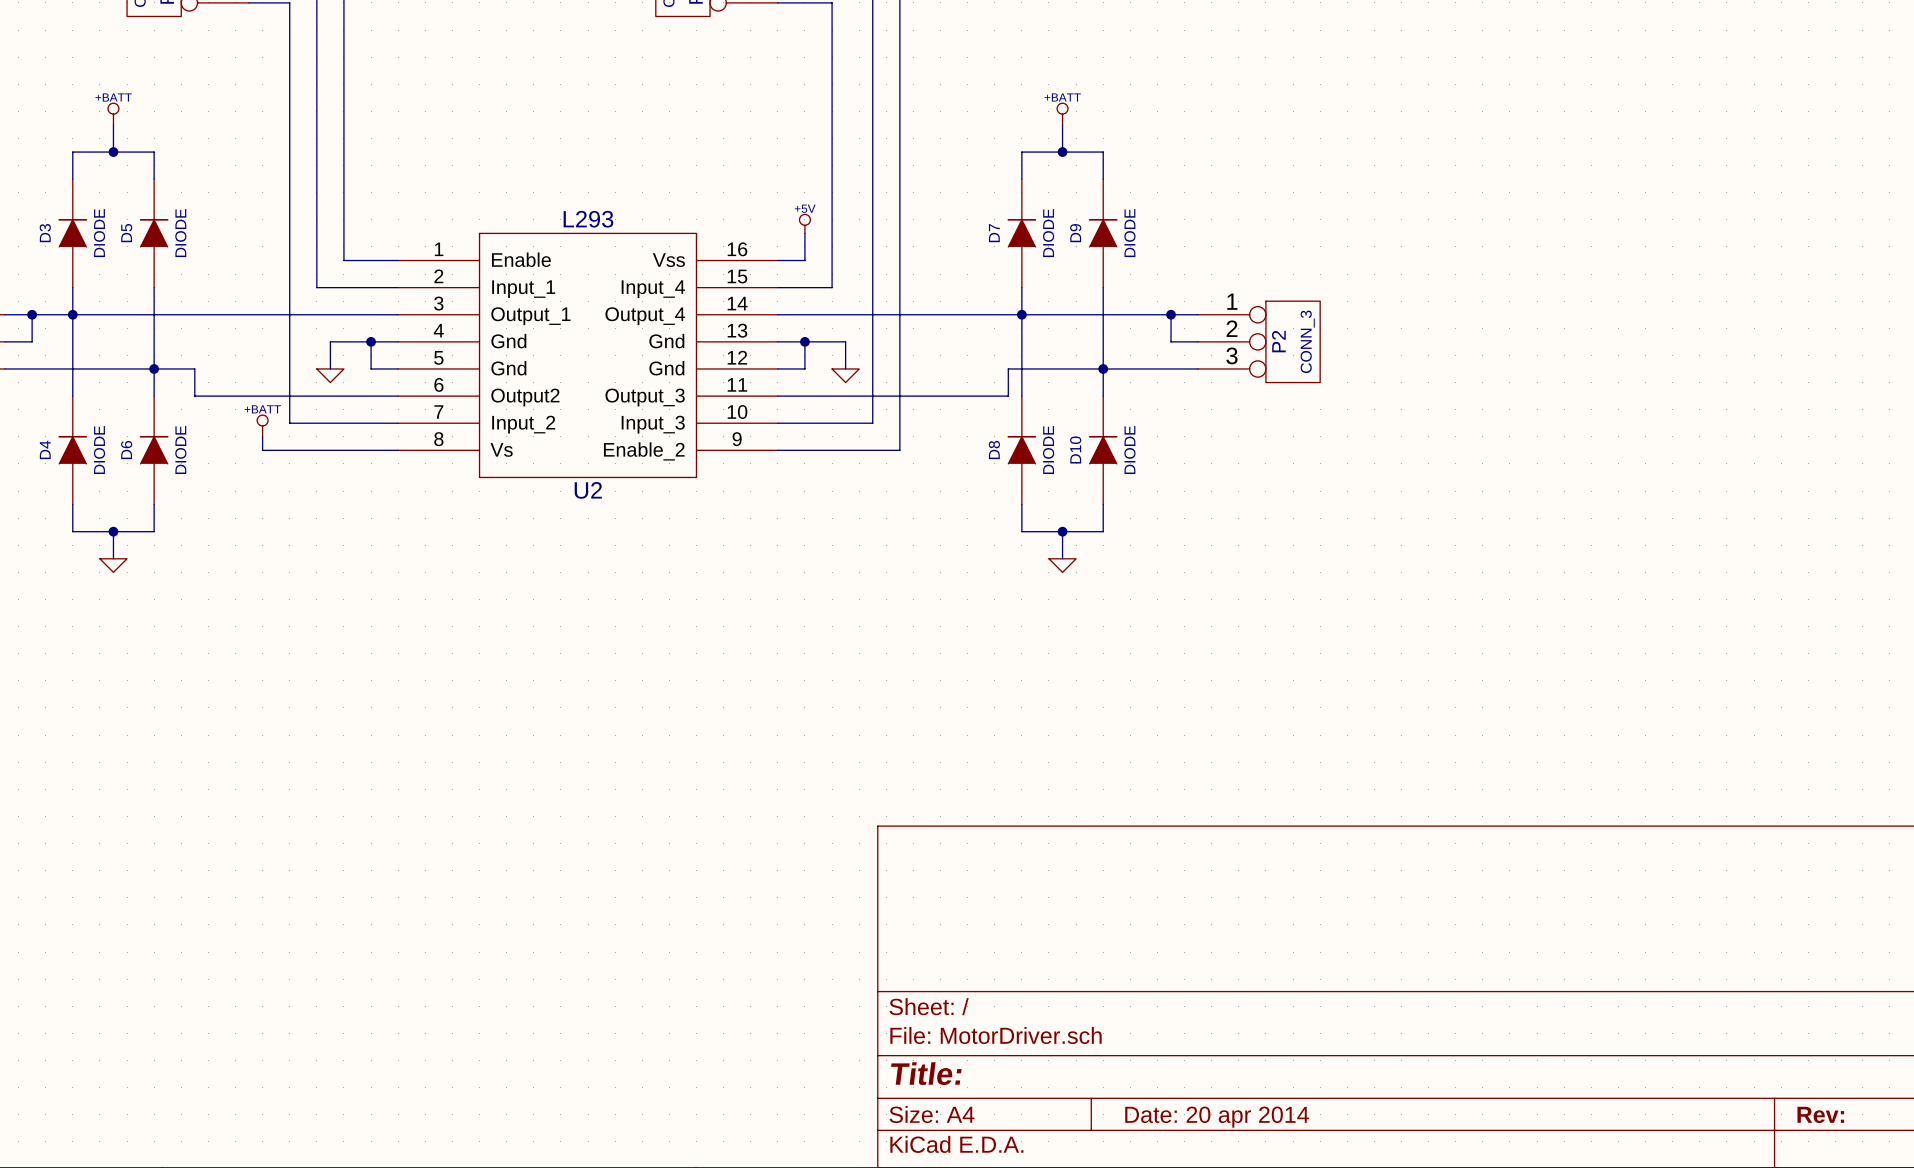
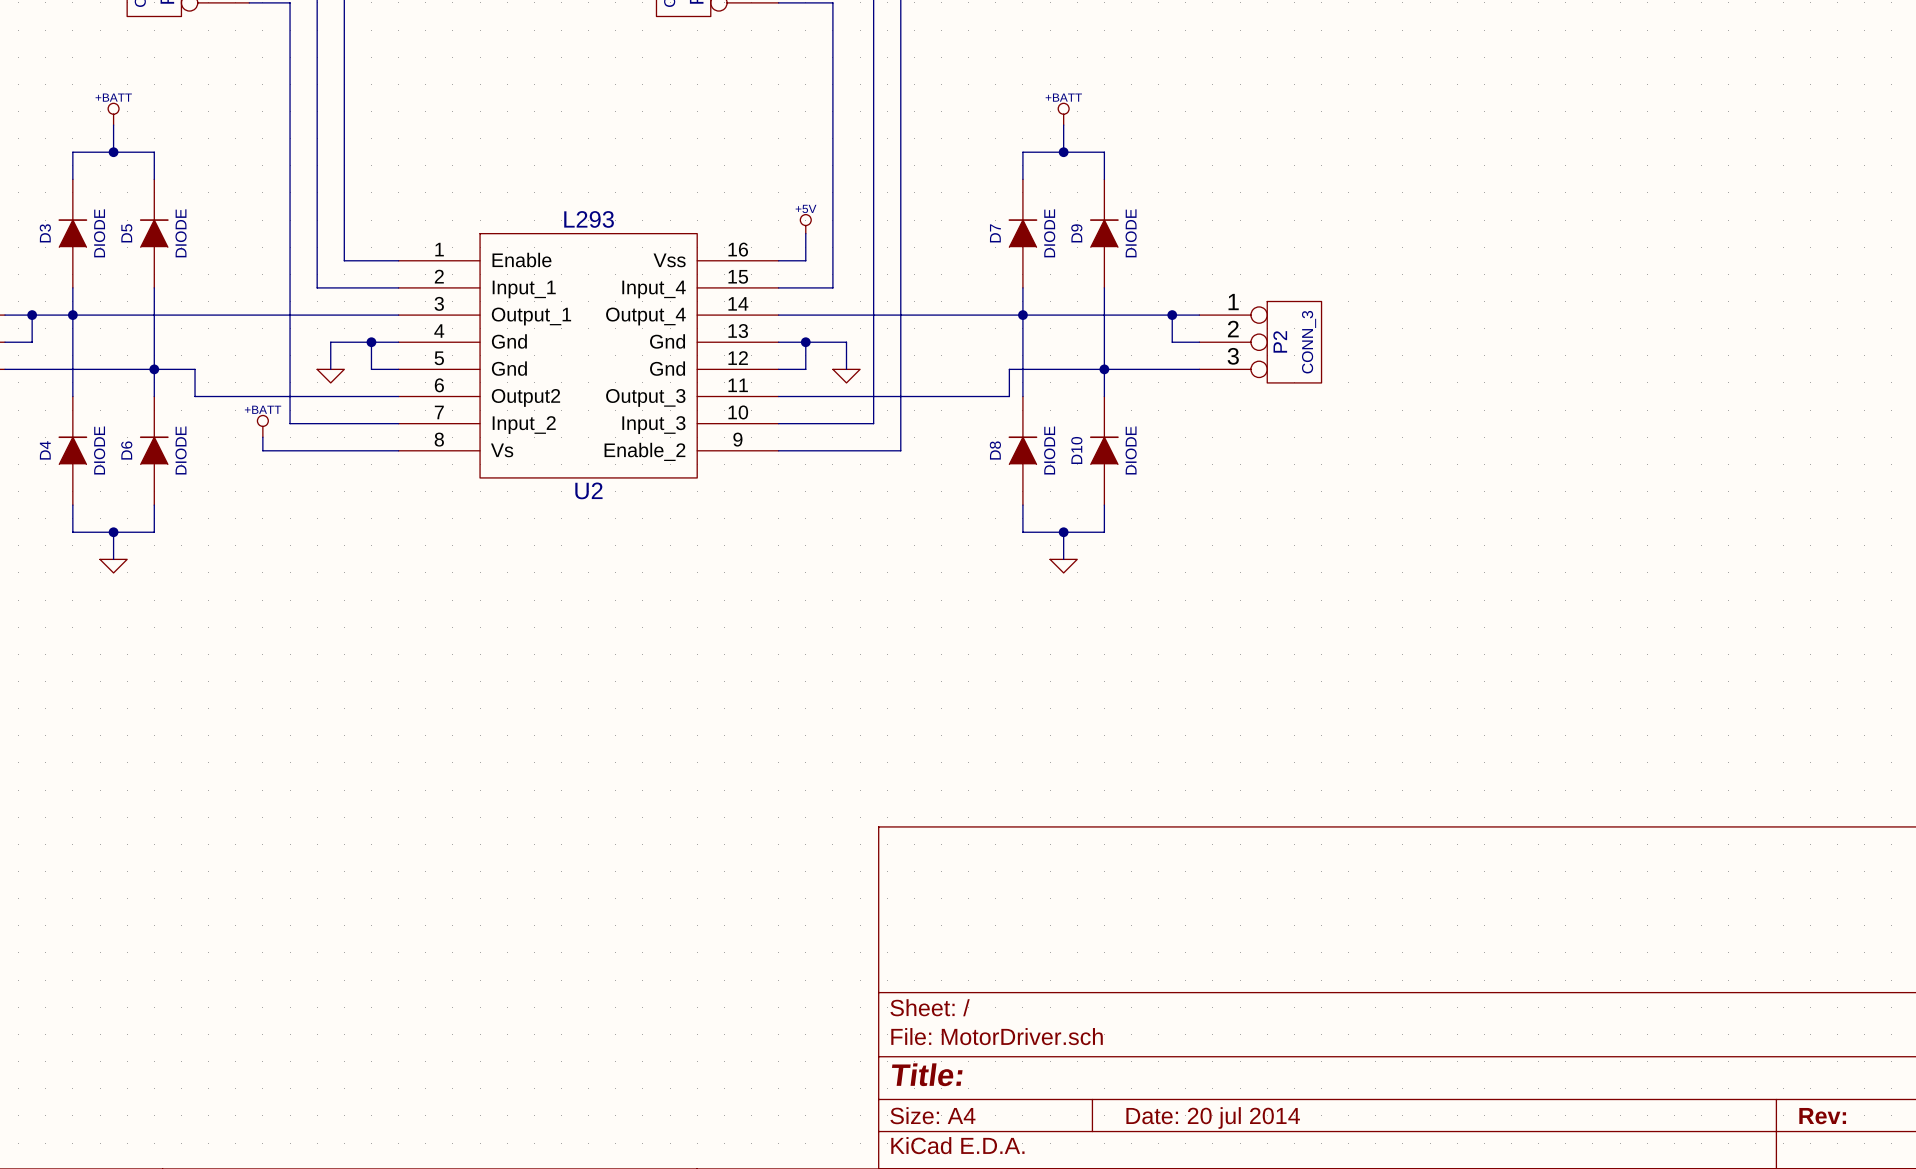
title block: Date: 20 apr 2014 (1217, 1117) -> Date: 20 jul 2014 (1213, 1117)

